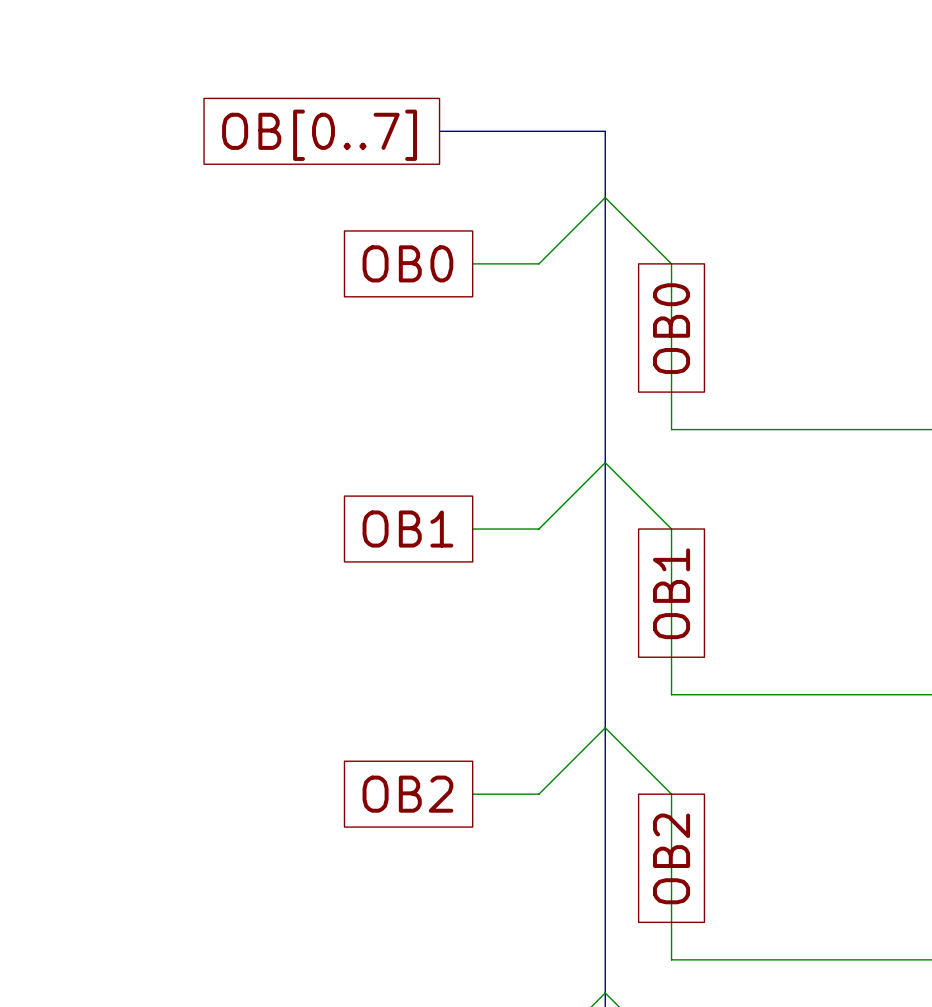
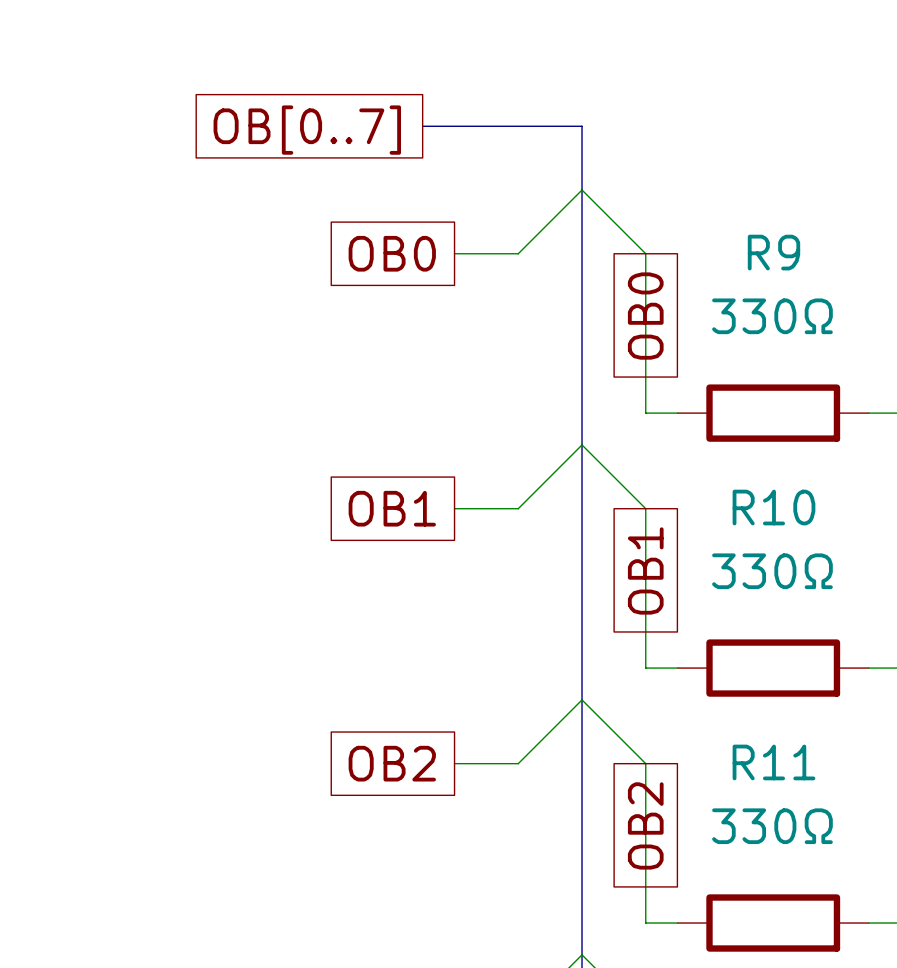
wire: (704, 429) (903, 429) -> none
R9: none -> 330Ω (773, 413)
wire: (704, 694) (903, 694) -> none
R10: none -> 330Ω (773, 668)
wire: (704, 959) (903, 959) -> none
R11: none -> 330Ω (773, 923)

